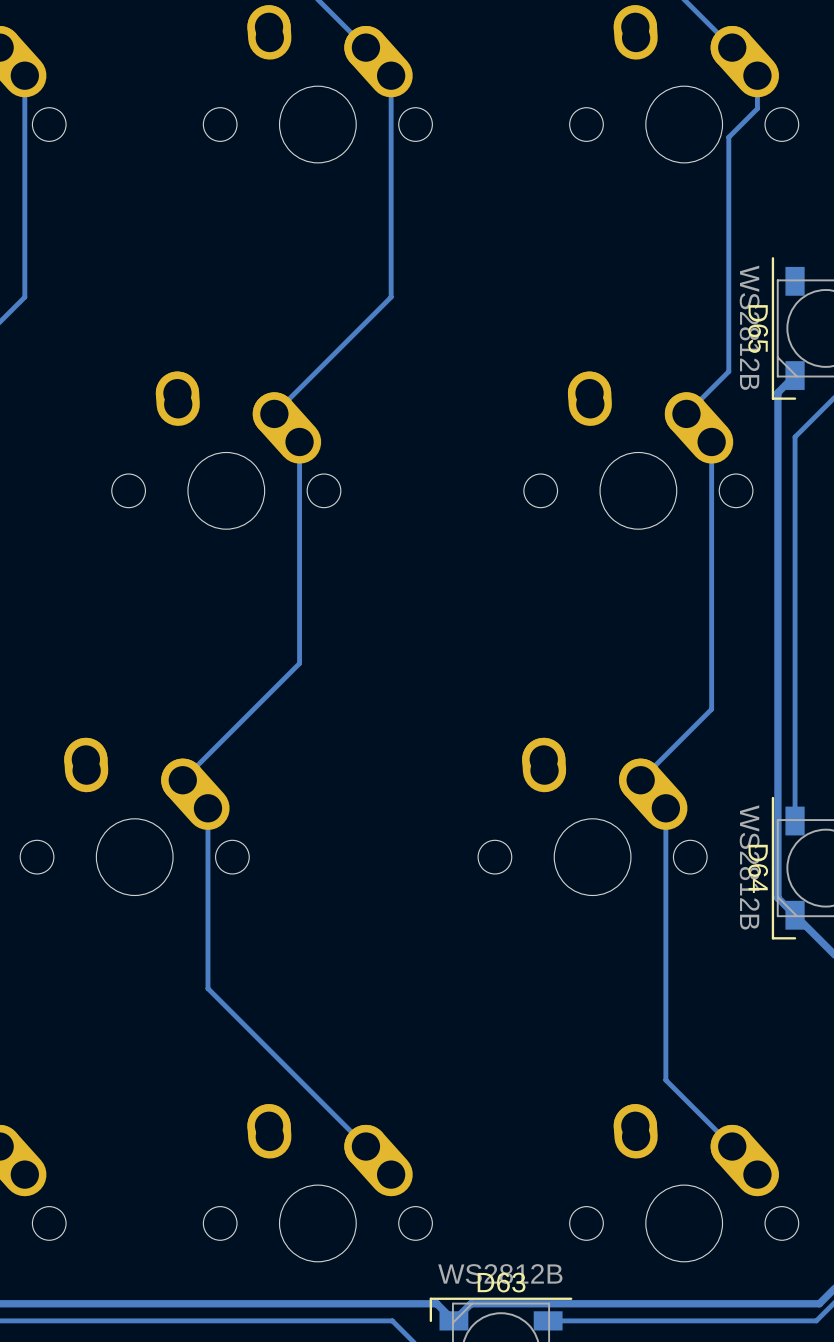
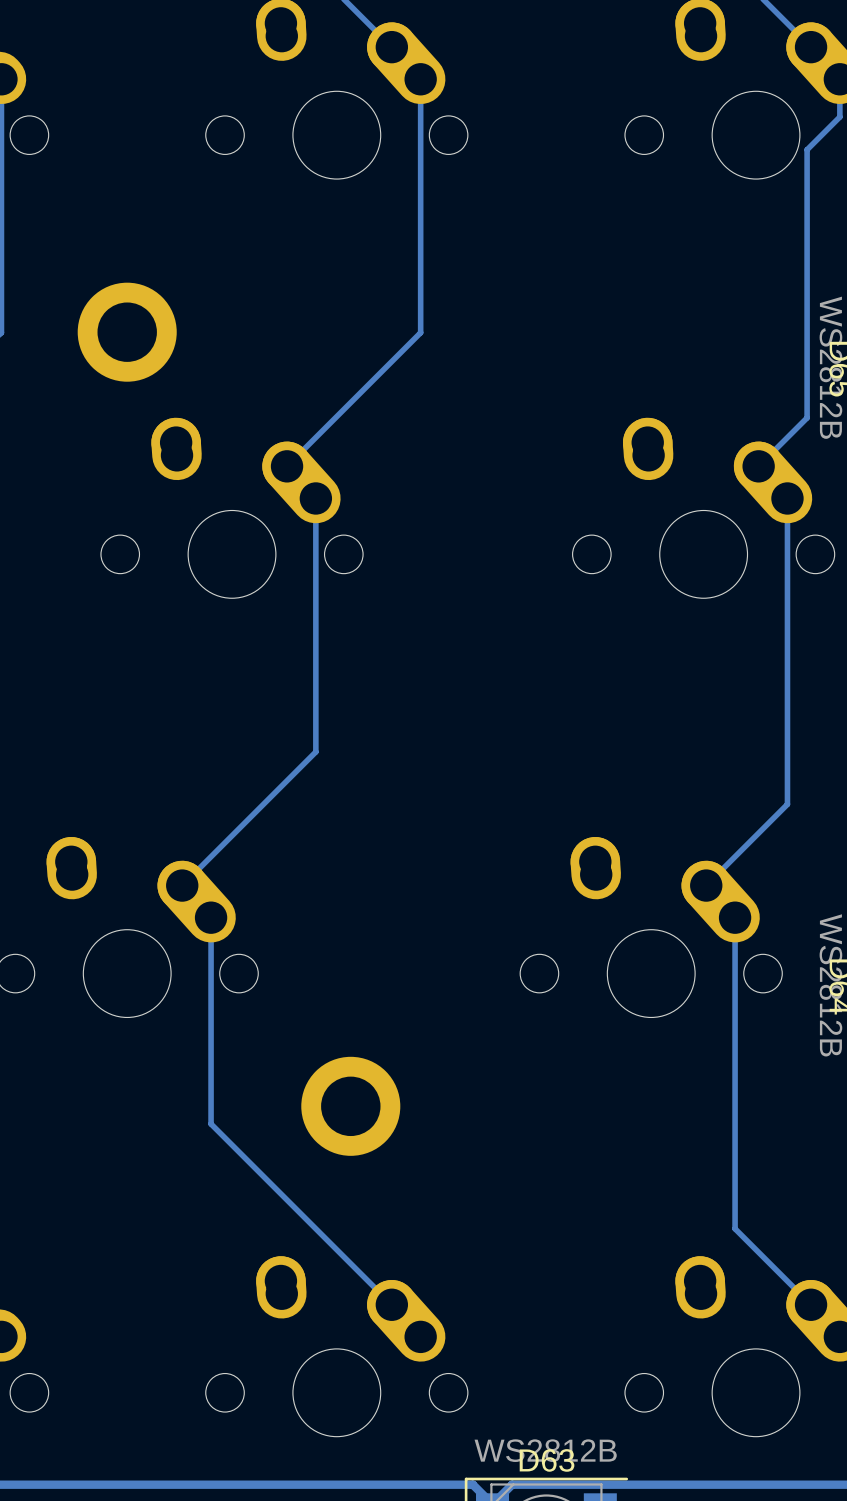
part: none -> (127, 332)
part: none -> (350, 1106)

